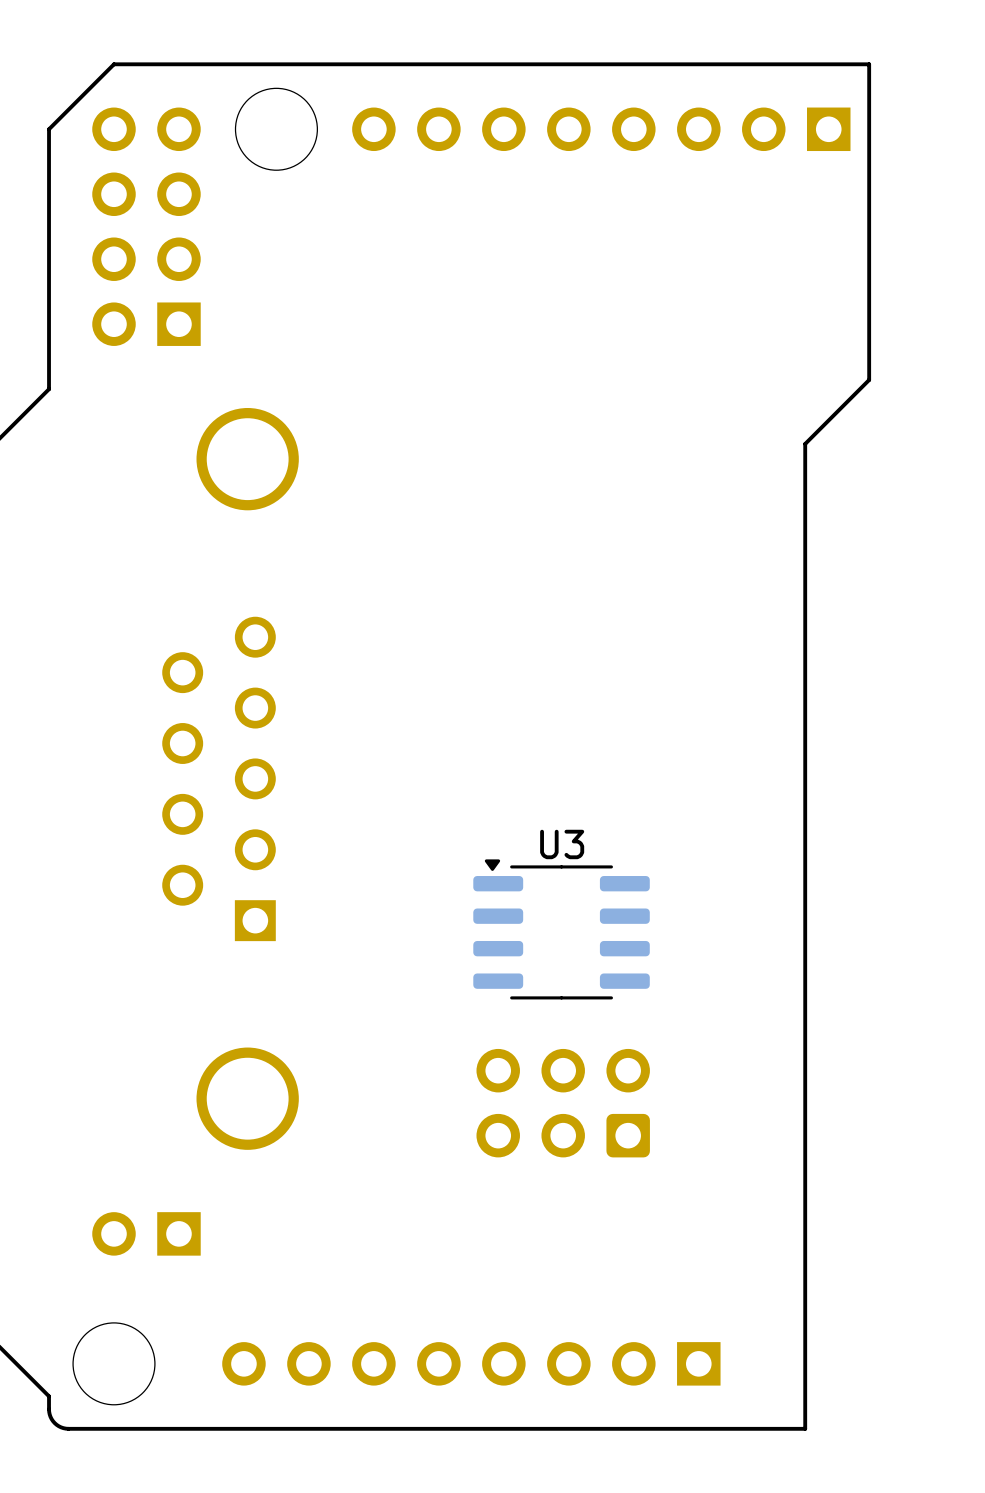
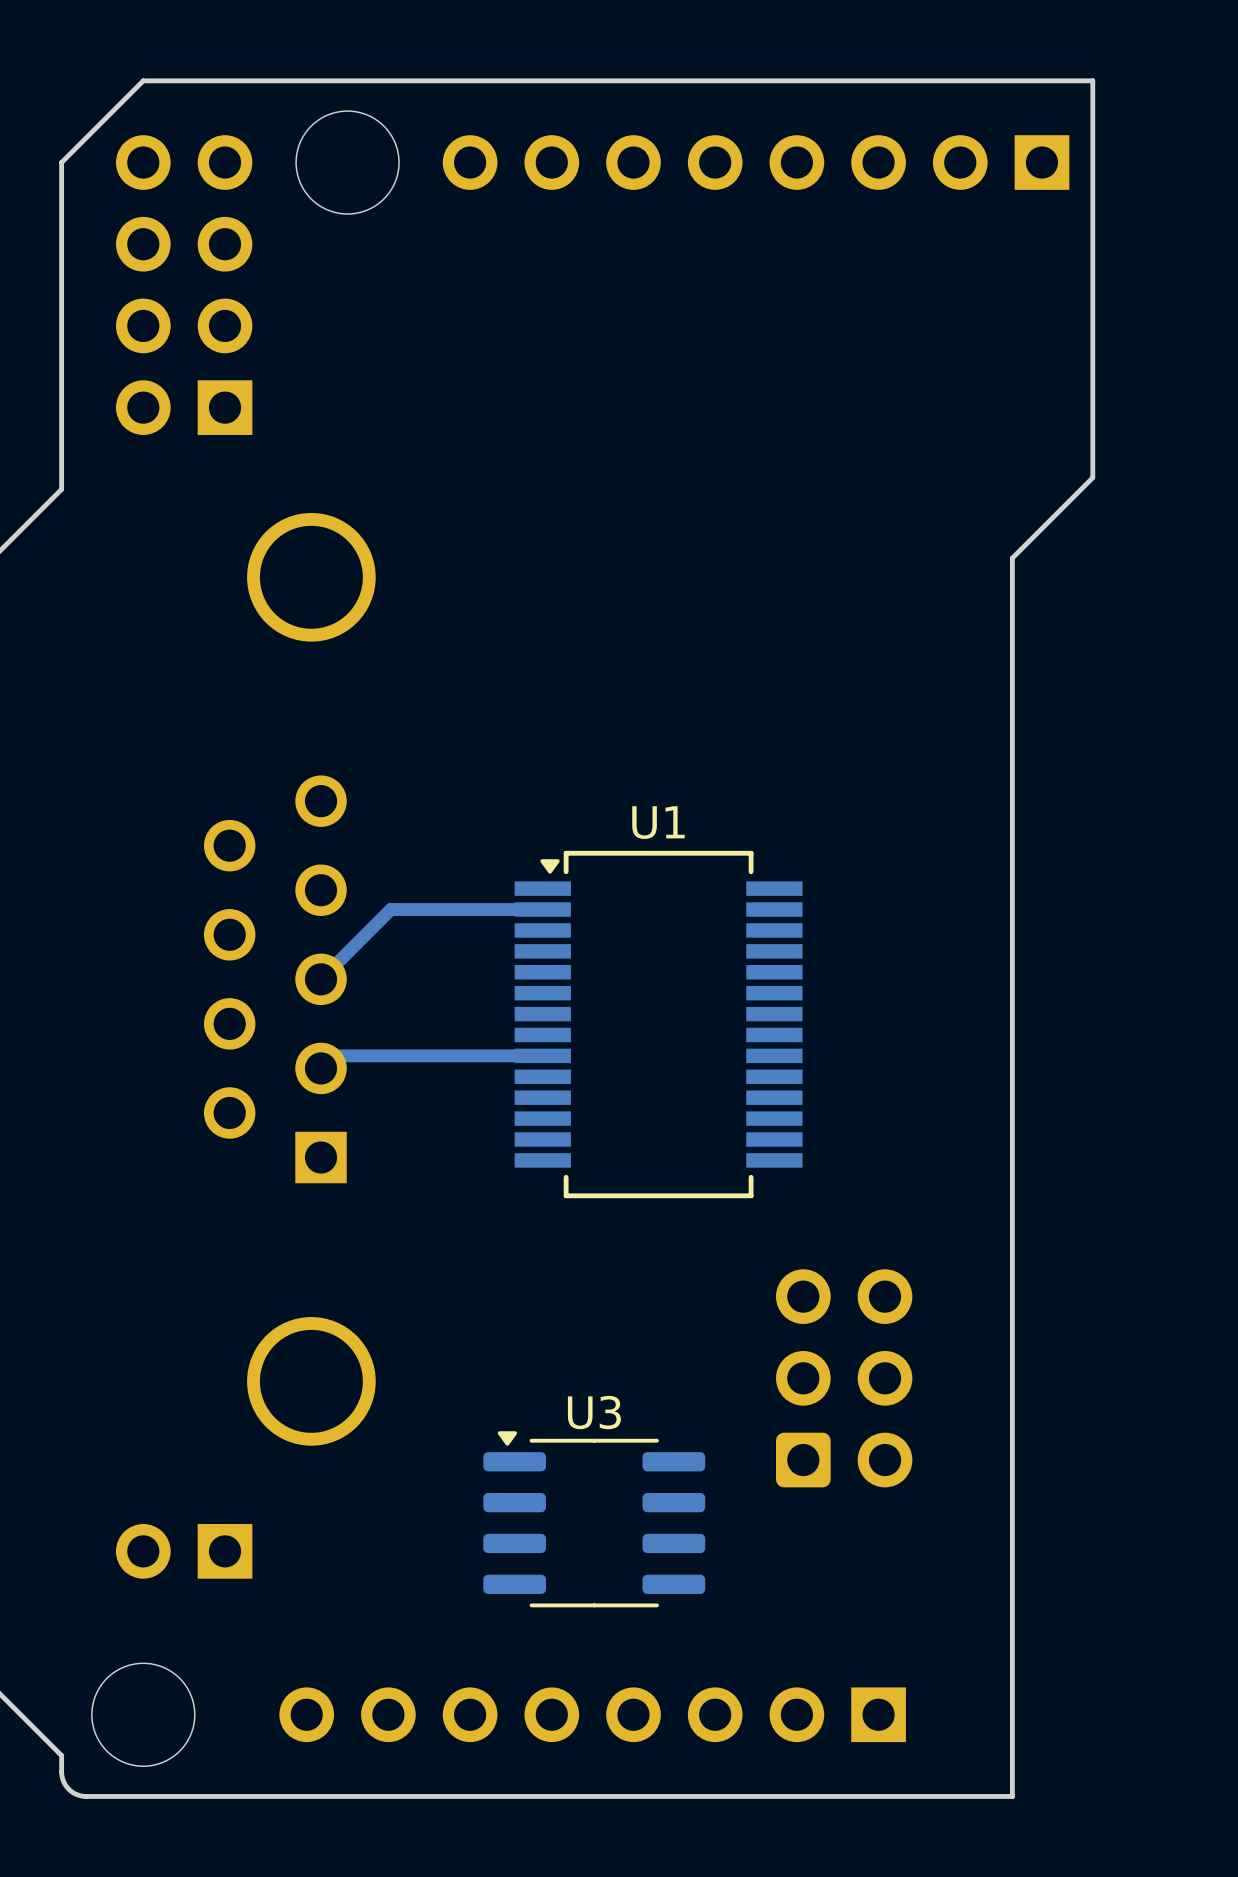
track: none -> (542, 909) (390, 909) (321, 979)
U1: none -> (658, 1024)
track: none -> (542, 1055) (333, 1055) (321, 1068)
U3 position: (561, 929) -> (594, 1519)
part rotation: 0° (563, 1103) -> 90° clockwise (844, 1378)
part position: (563, 1103) -> (844, 1378)

